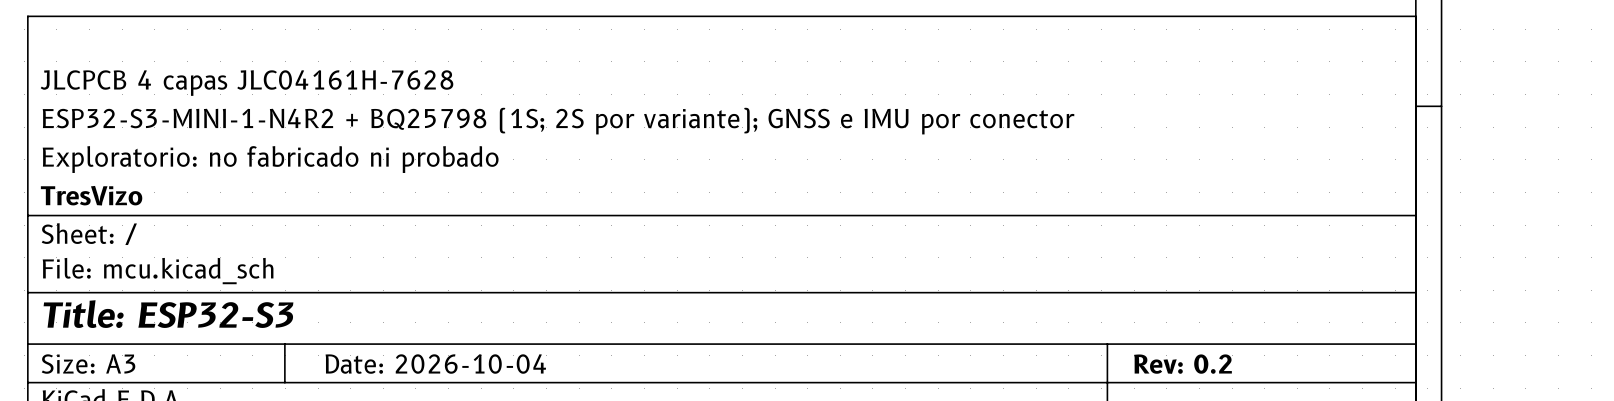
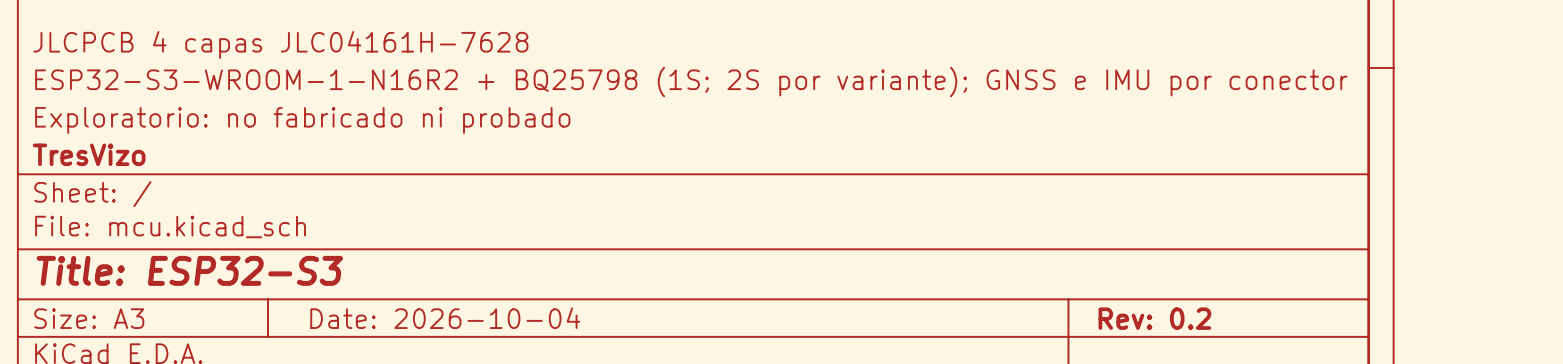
title block: ESP32-S3-MINI-1-N4R2 + BQ25798 (1S; 2S por variante); GNSS e IMU por conector (558, 121) -> ESP32-S3-WROOM-1-N16R2 + BQ25798 (1S; 2S por variante); GNSS e IMU por conector (691, 82)

